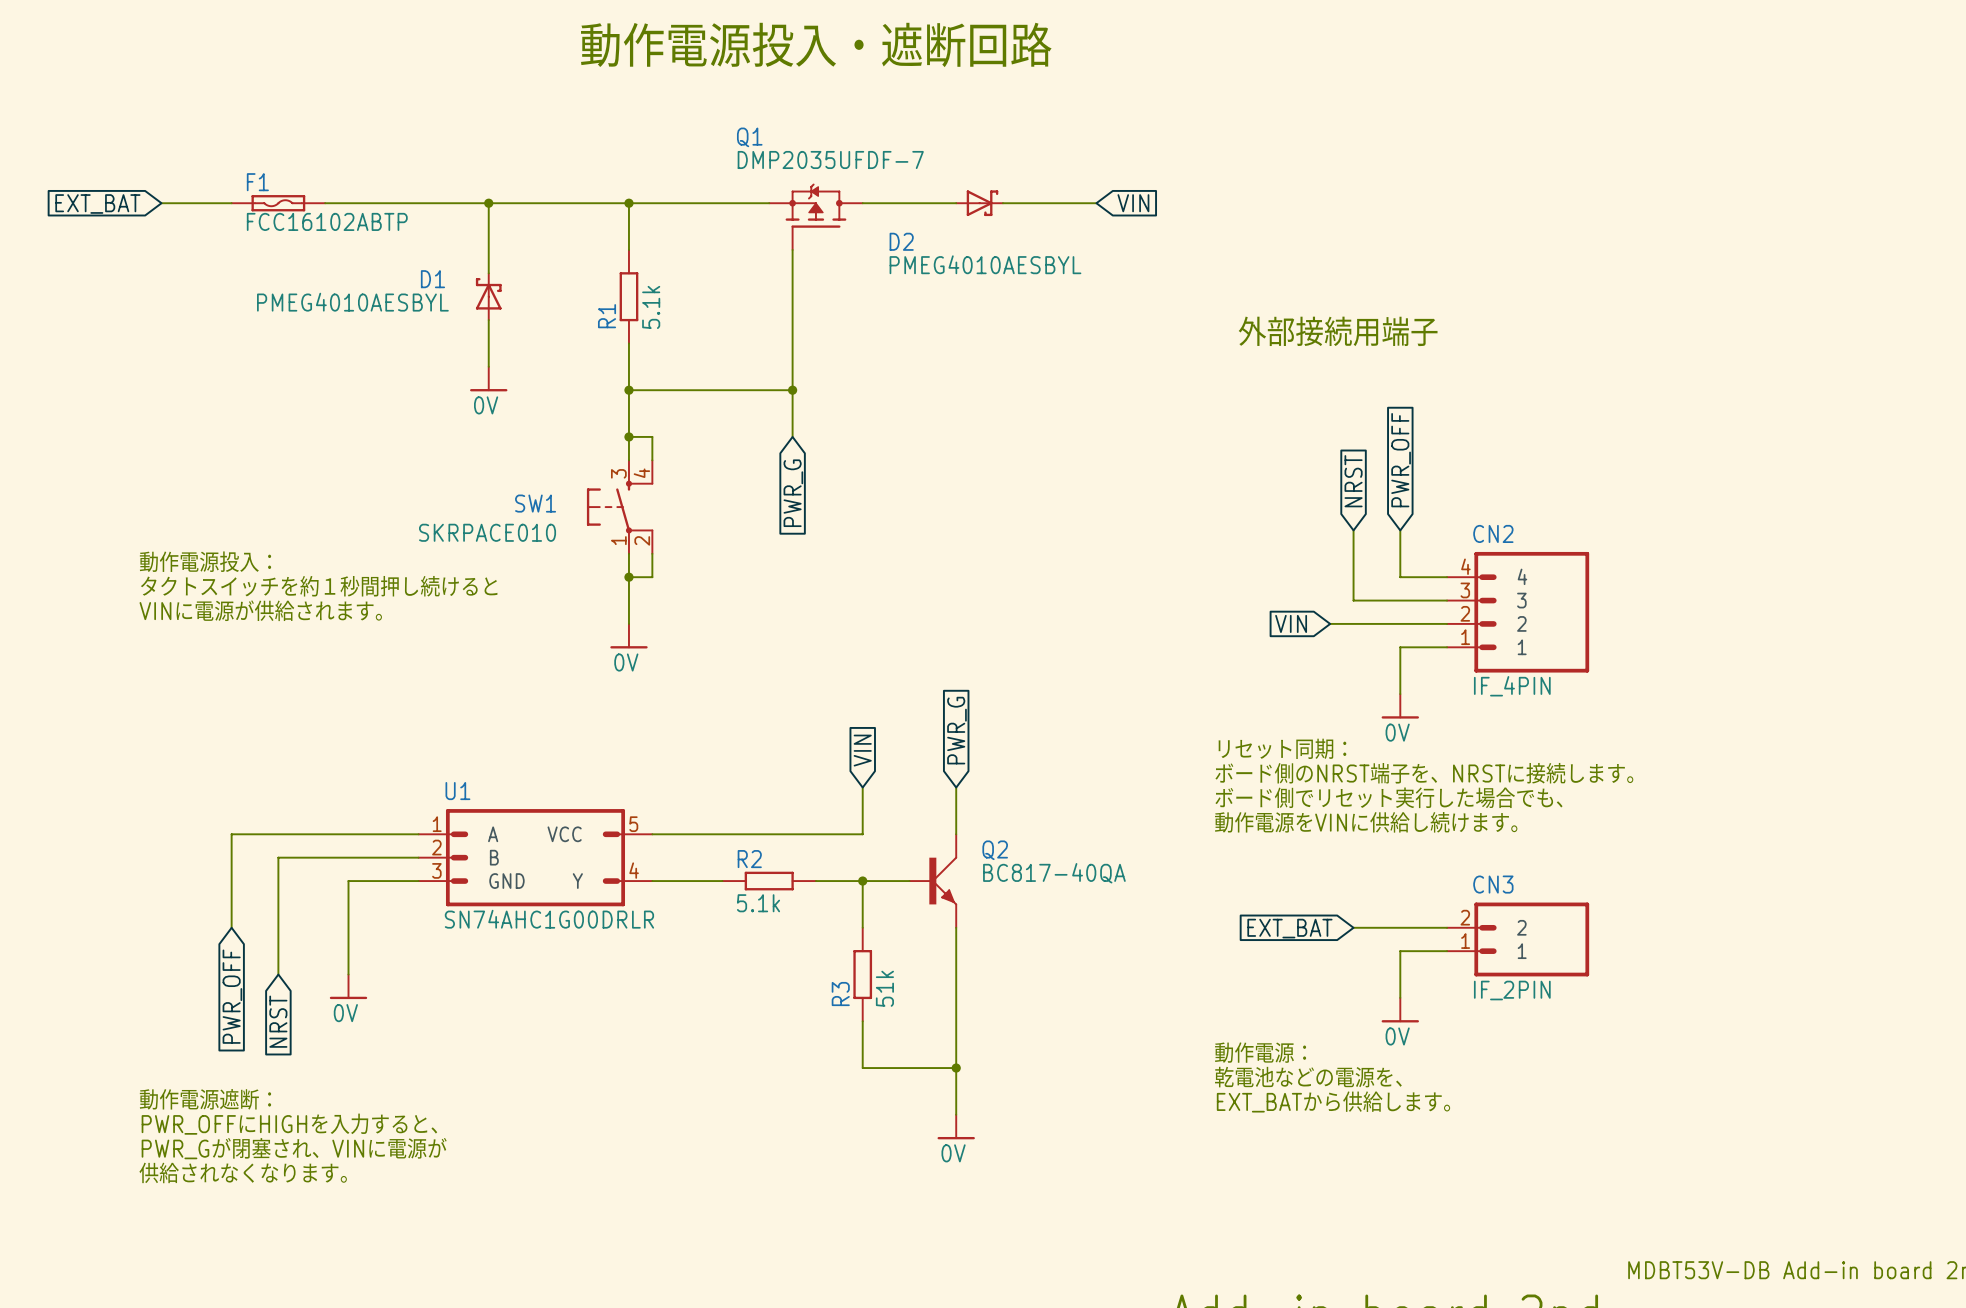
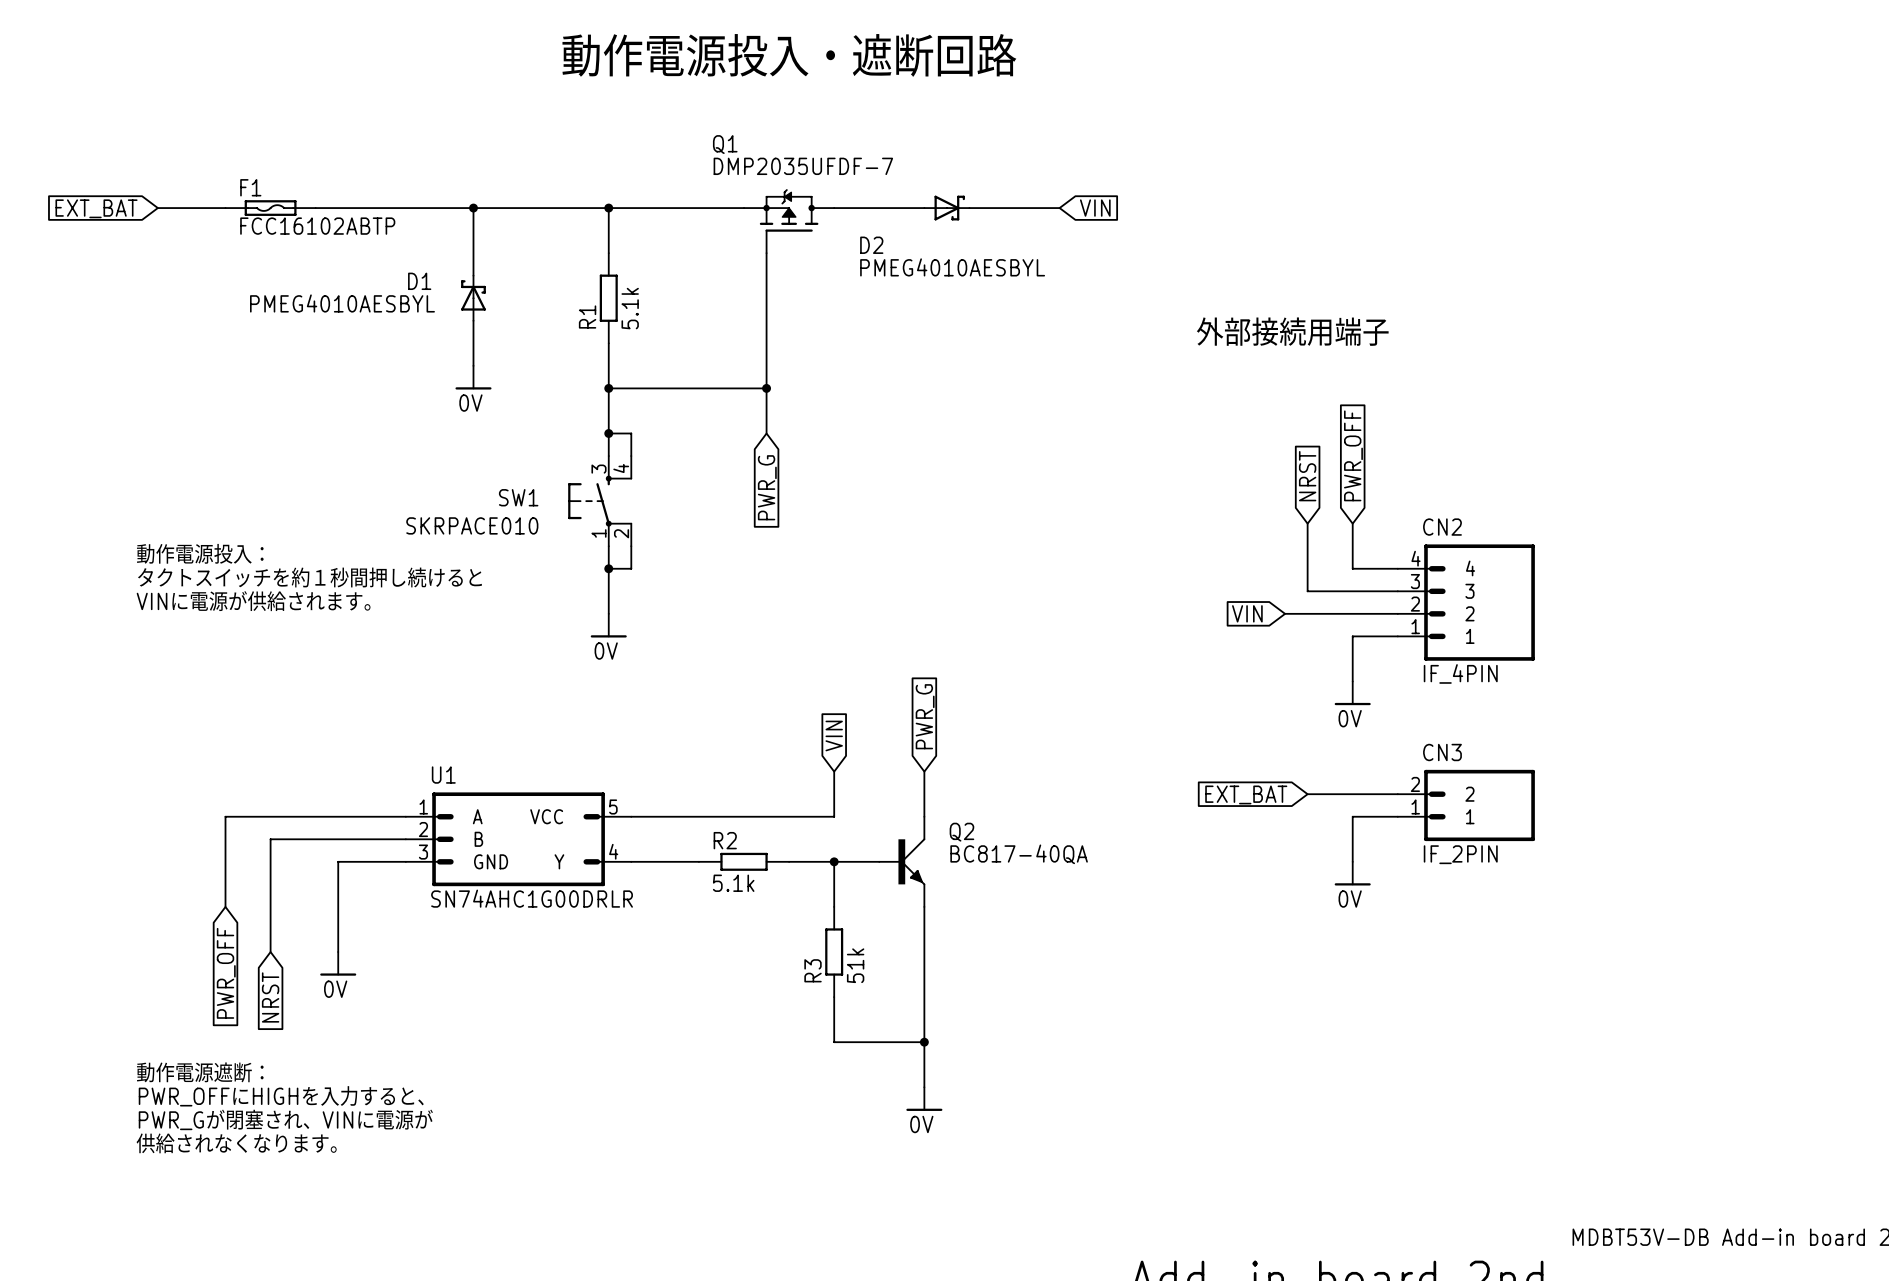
text: リセット同期： (1282, 748) -> none
text: ボード側のNRST端子を、NRSTに接続します。 (1424, 773) -> none
text: ボード側でリセット実行した場合でも、 (1388, 797) -> none
text: 動作電源をVINに供給し続けます。 (1366, 822) -> none
wire: (1353, 927) (1447, 927) -> (1307, 794) (1397, 794)
global label position: EXT_BAT (1289, 928) -> EXT_BAT (1246, 794)
CN3 position: (1518, 939) -> (1466, 805)
wire: (1447, 951) (1400, 951) (1400, 997) -> (1397, 816) (1352, 816) (1352, 861)
power symbol position: 0V (1400, 1010) -> 0V (1352, 873)
text: 動作電源： (1260, 1052) -> none
text: 乾電池などの電源を、 (1308, 1077) -> none
text: EXT_BATから供給します。 (1333, 1101) -> none

